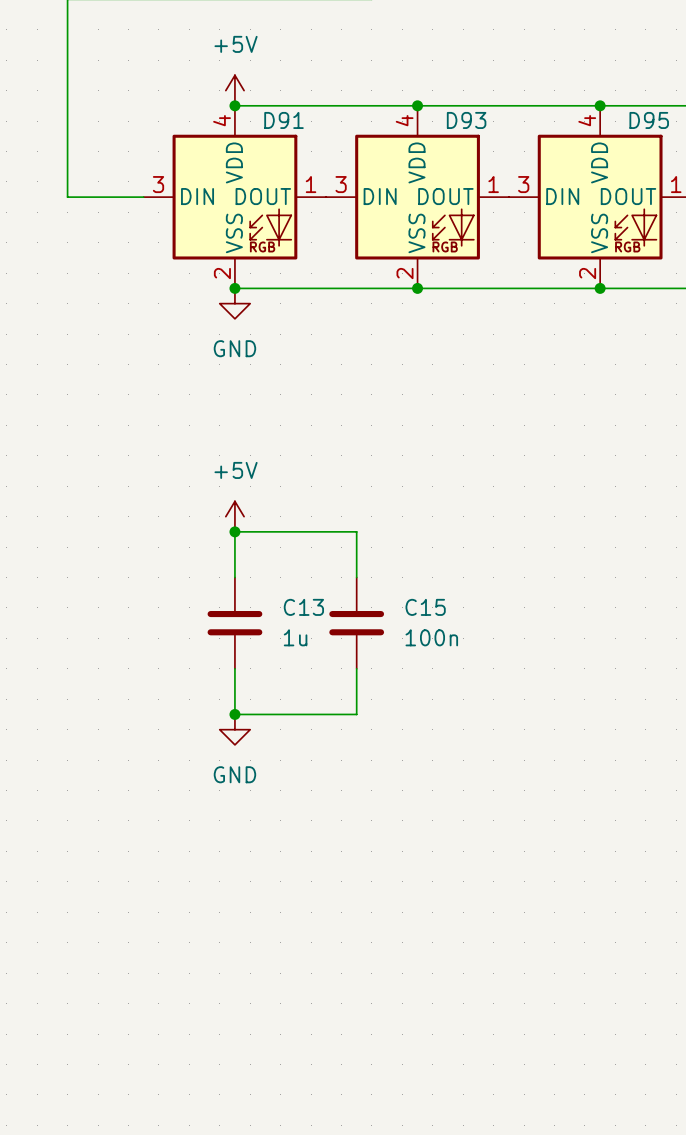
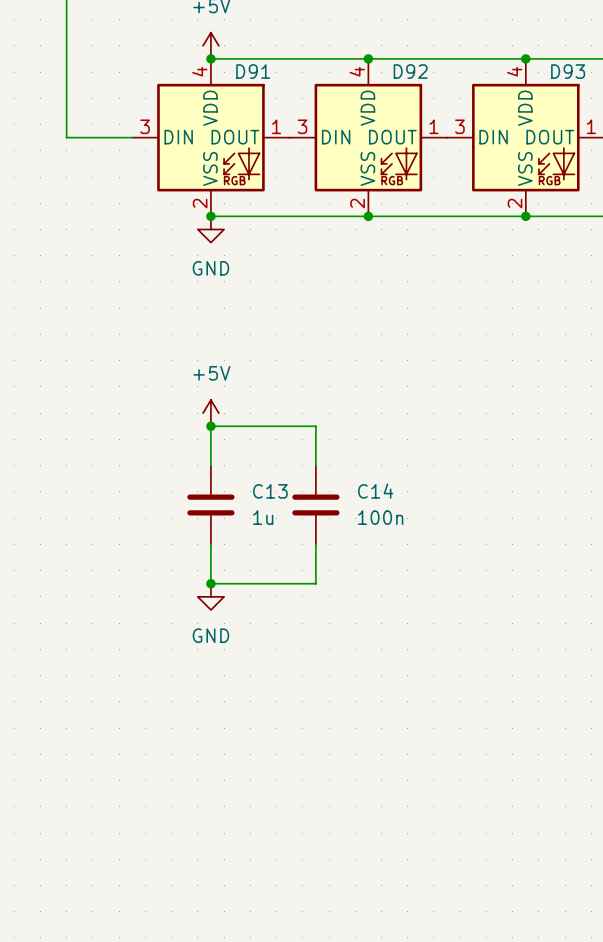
D93 name: D93 (466, 120) -> D92 (410, 71)
D95 name: D95 (649, 120) -> D93 (568, 71)
C15 name: C15 (425, 607) -> C14 (375, 491)

